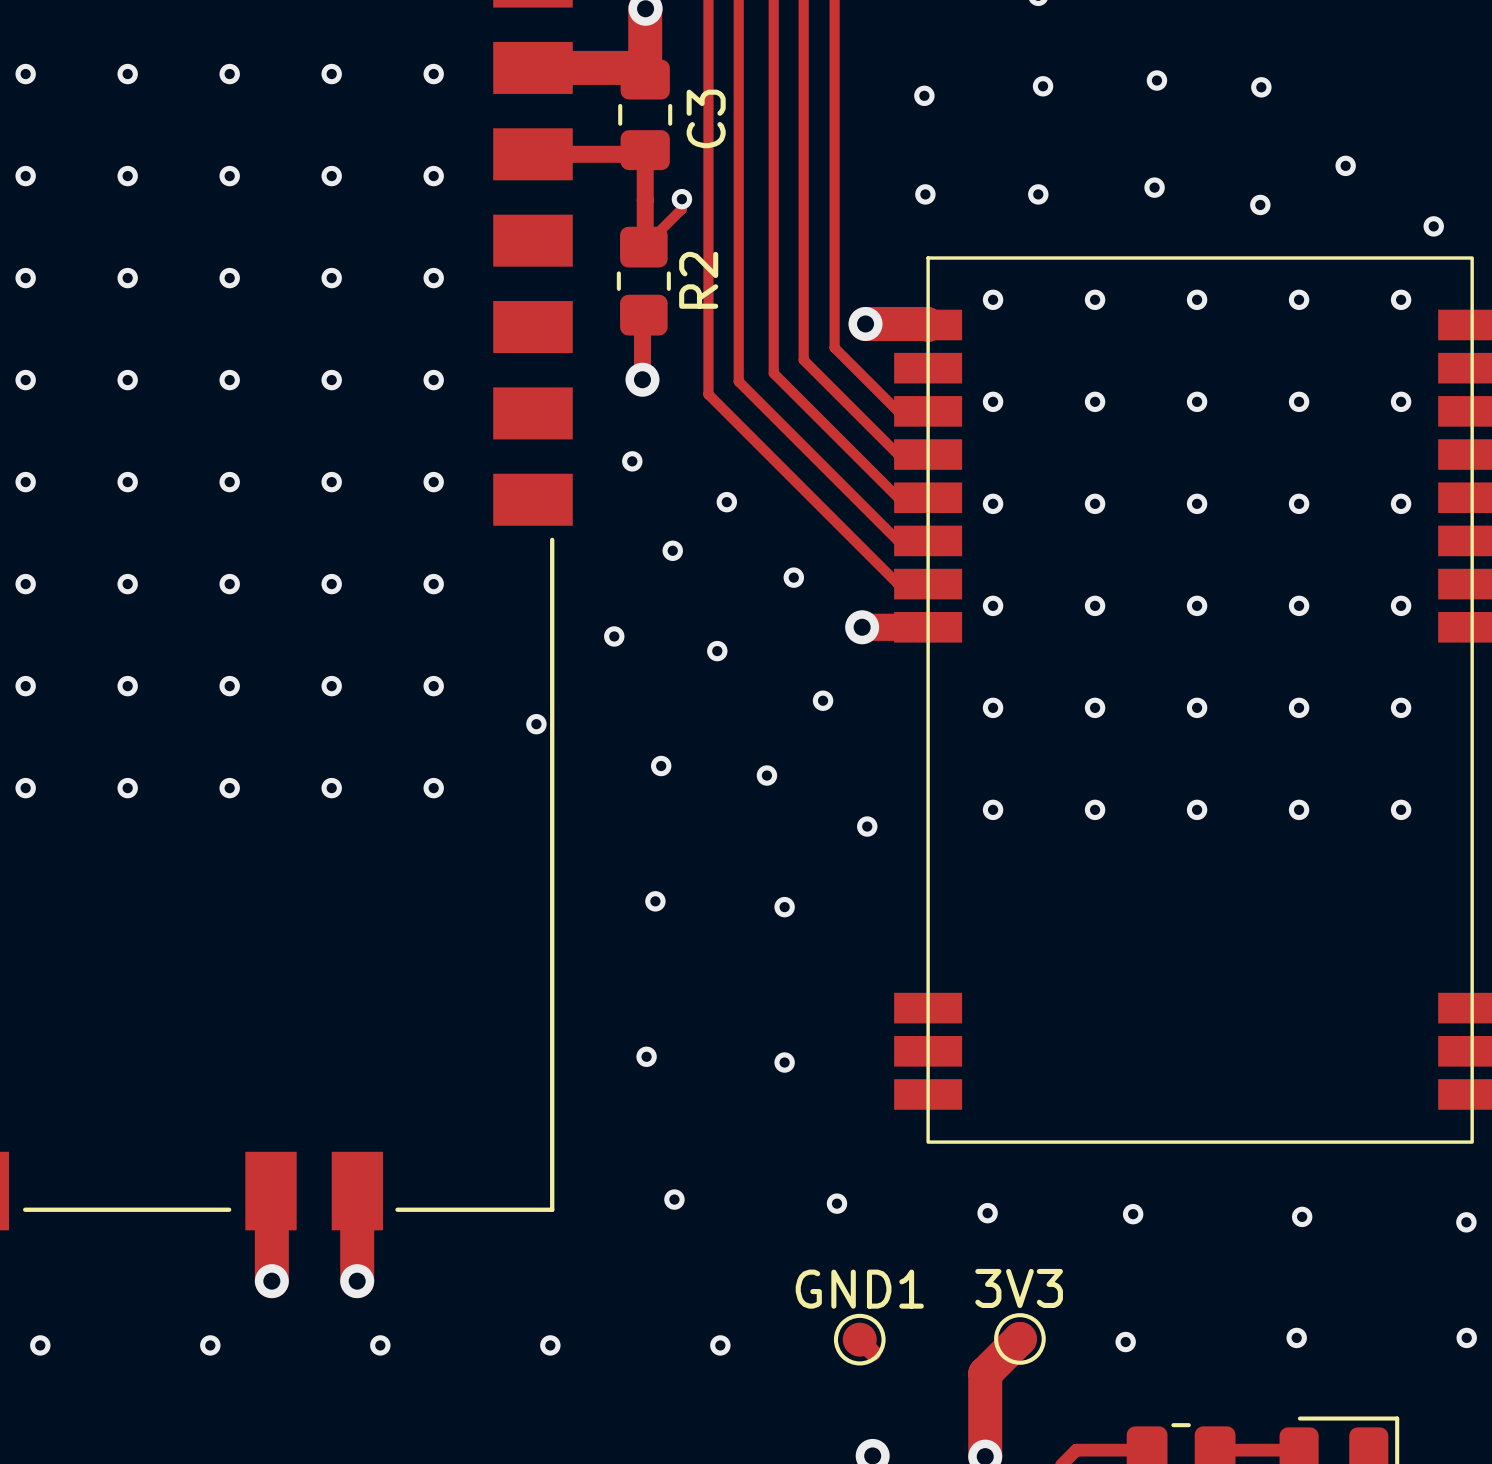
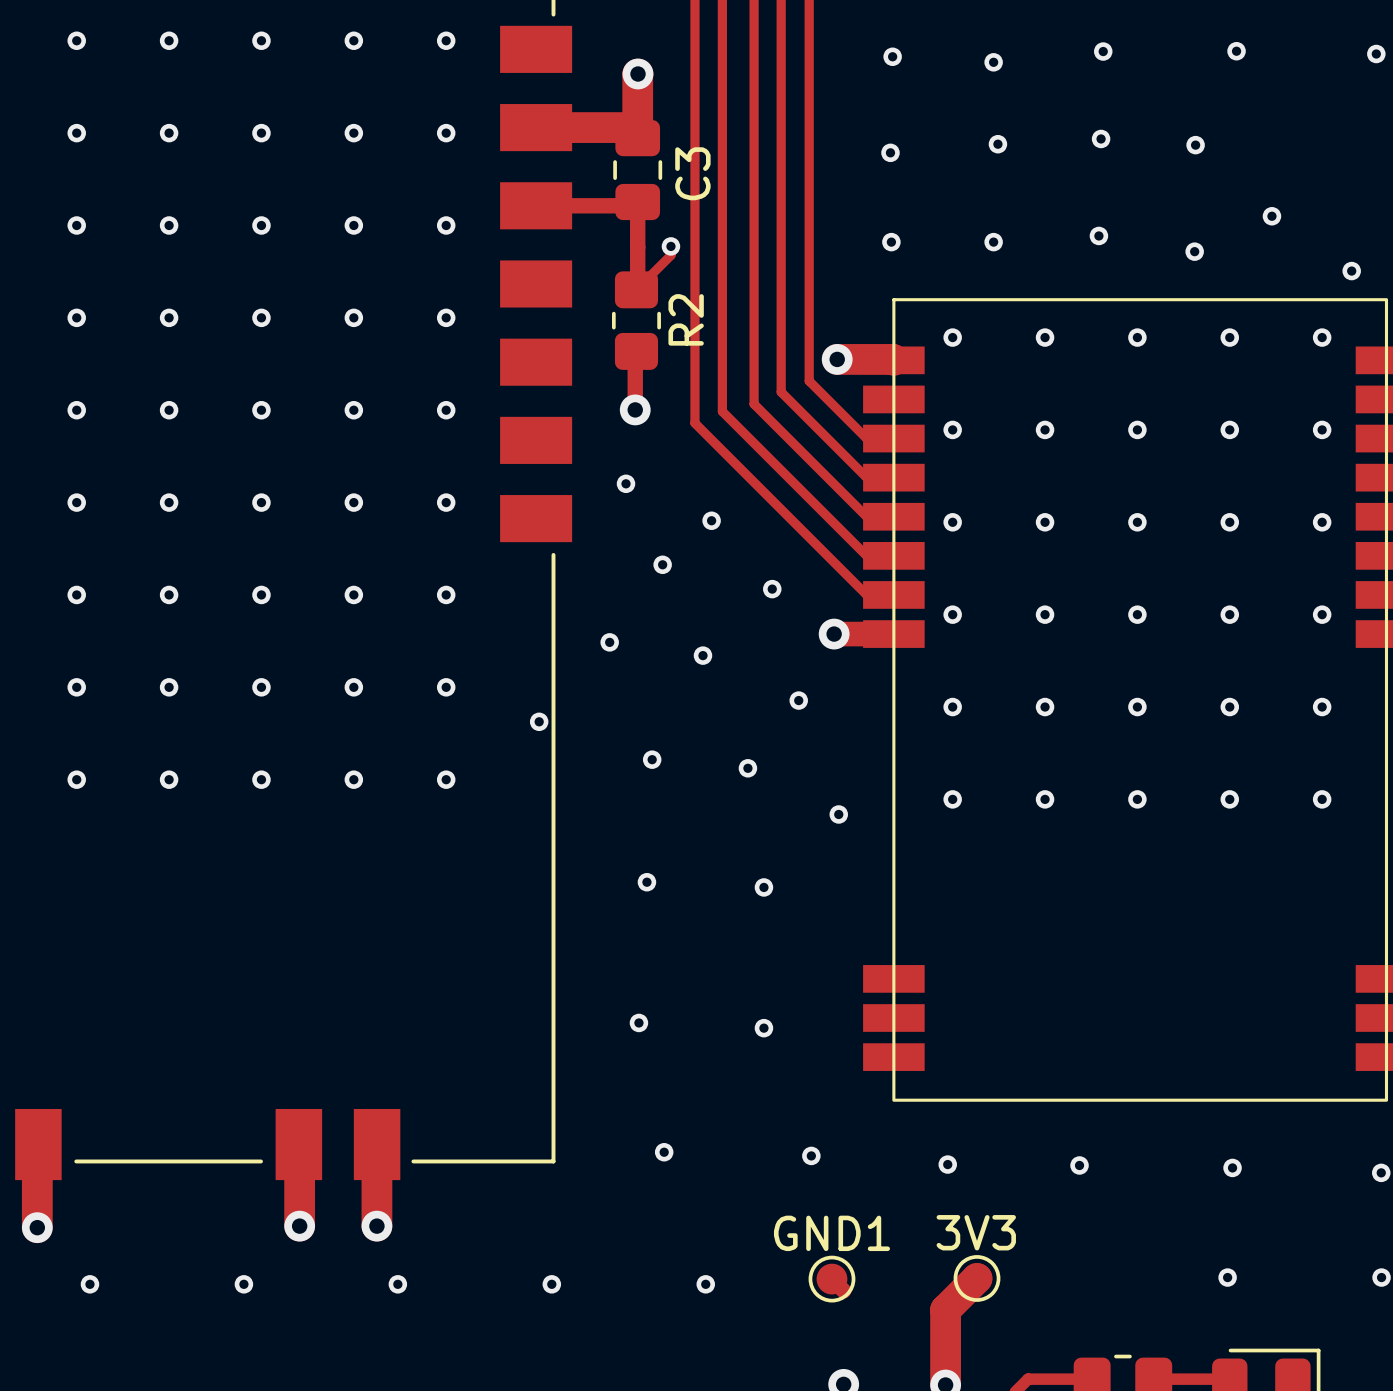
via: (1125, 1342) -> none

